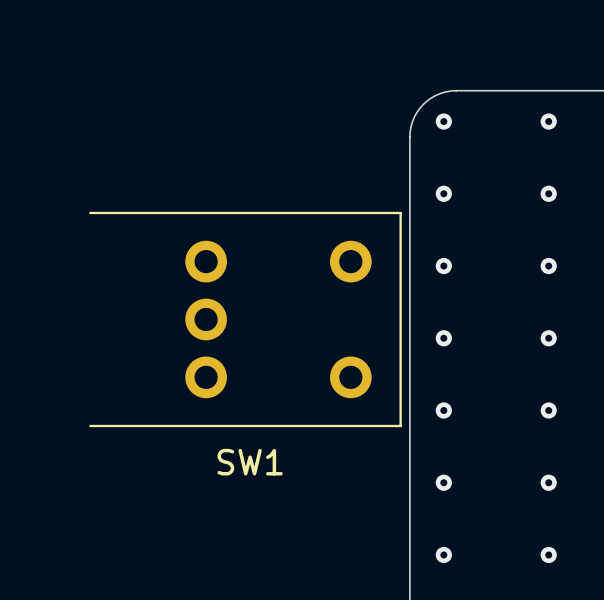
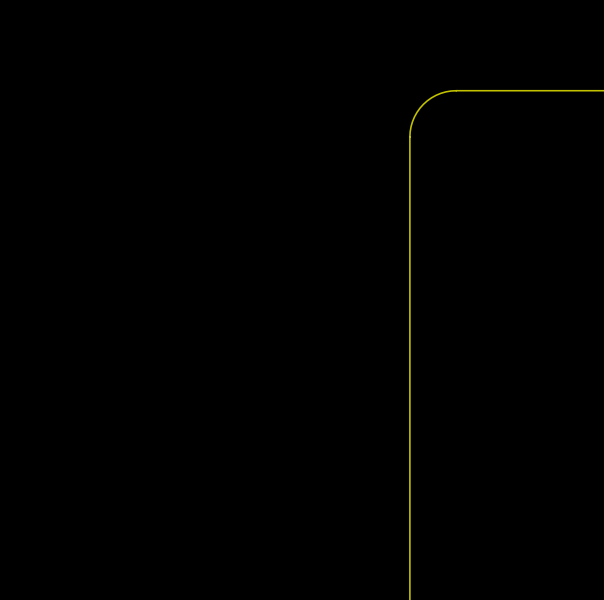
via: (443, 121) -> none
via: (548, 121) -> none
via: (443, 193) -> none
via: (548, 193) -> none
via: (443, 266) -> none
via: (548, 266) -> none
SW1: (245, 319) -> none
via: (443, 338) -> none
via: (548, 338) -> none
via: (443, 410) -> none
via: (548, 410) -> none
via: (443, 482) -> none
via: (548, 482) -> none
via: (443, 554) -> none
via: (548, 554) -> none

